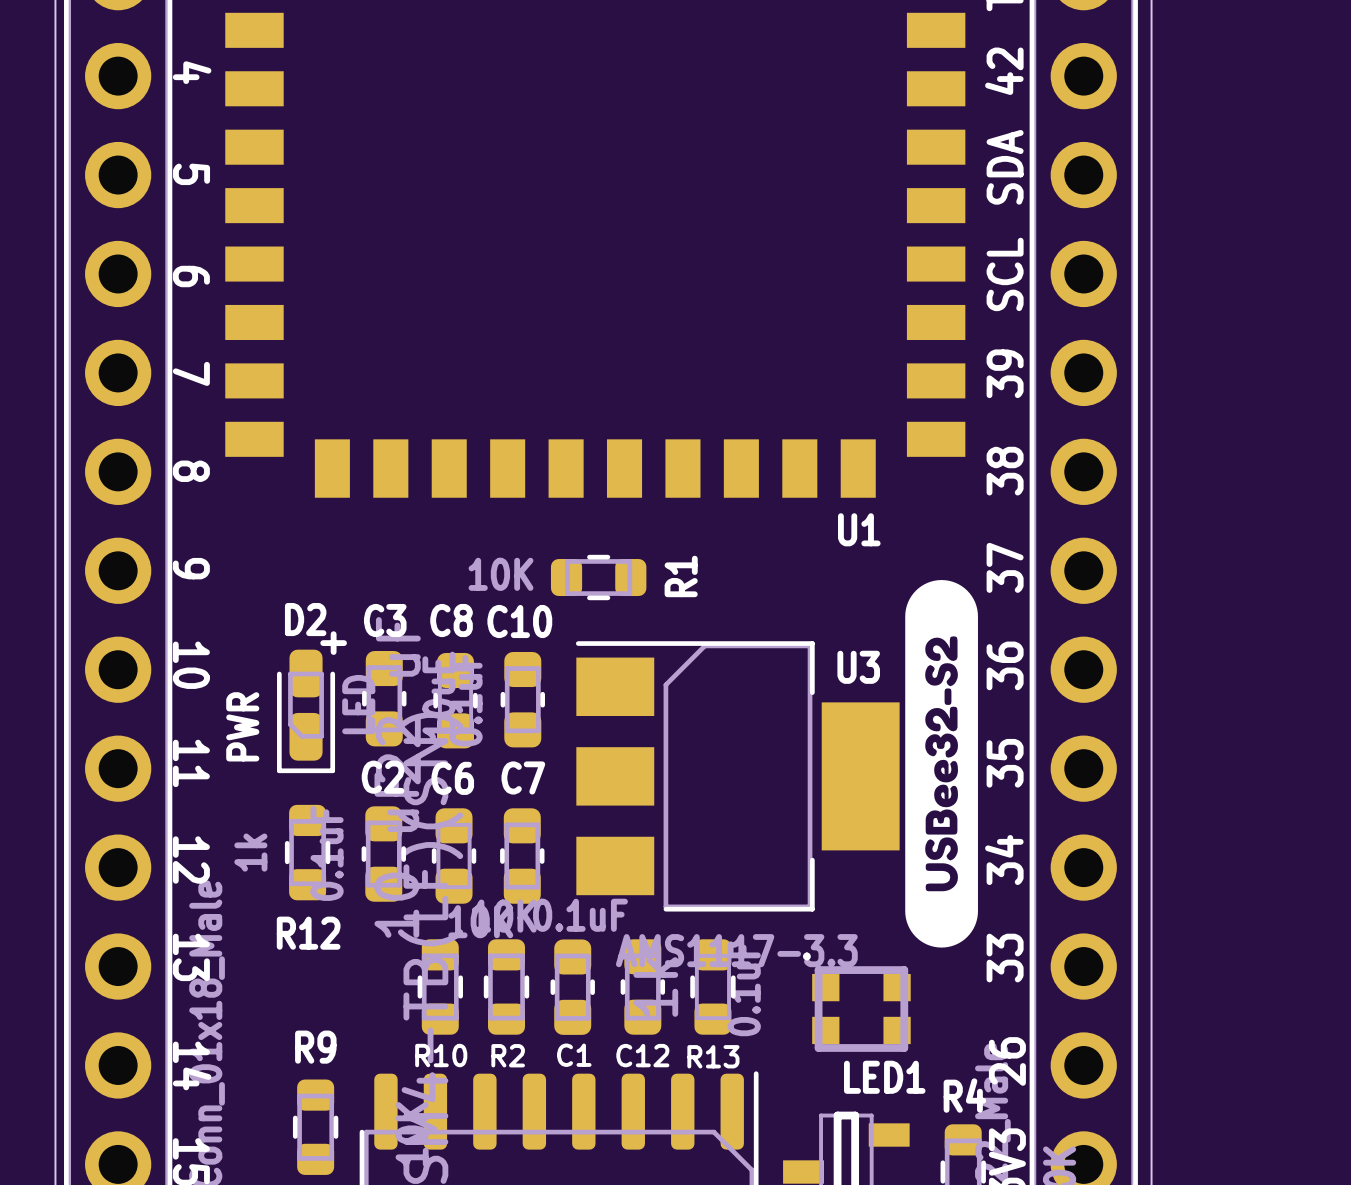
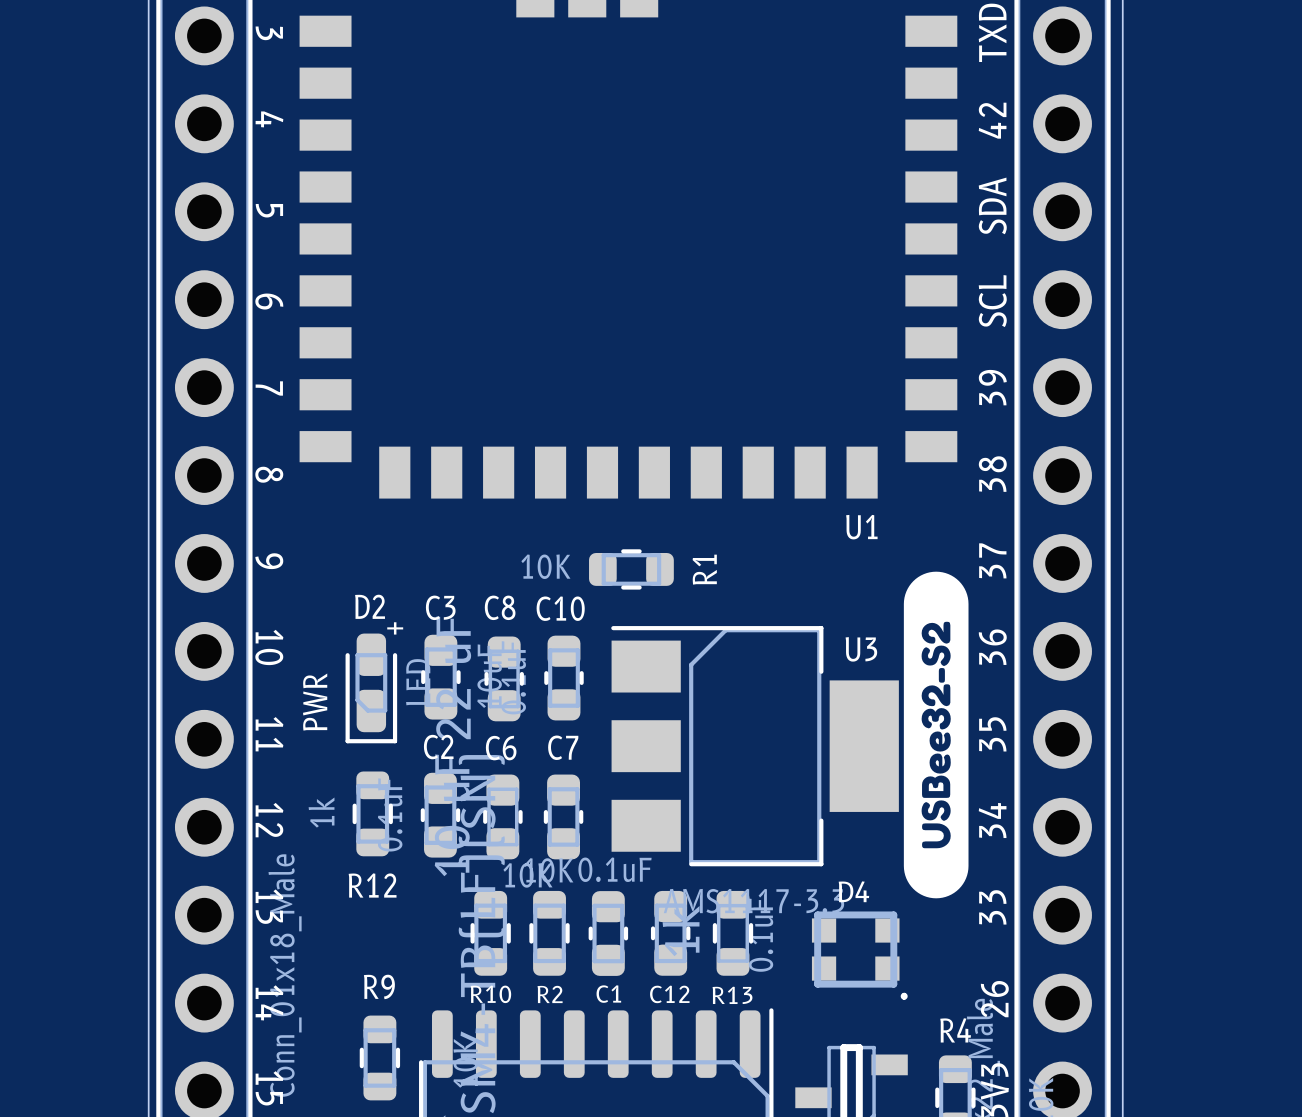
LED1: (856, 1002) -> none
D4: none -> (859, 955)

